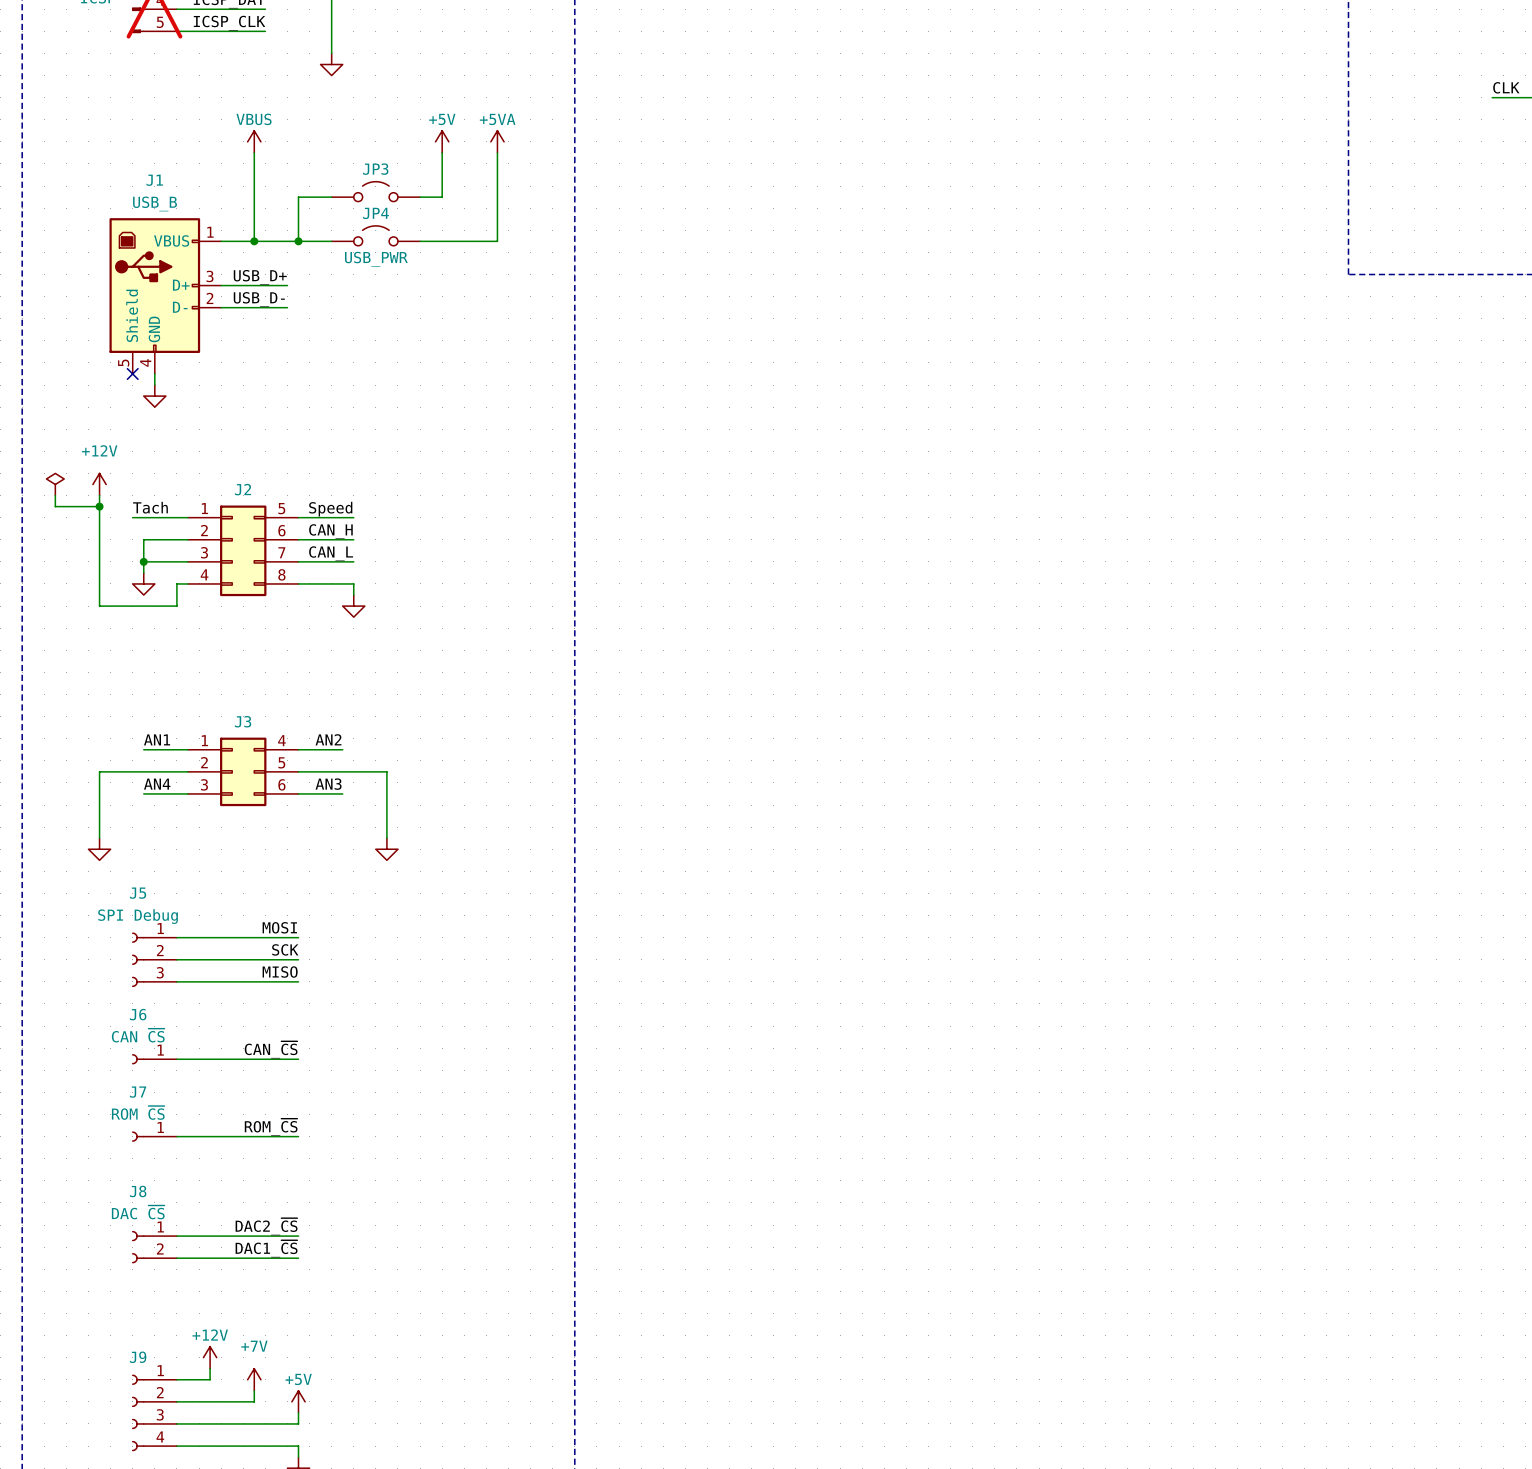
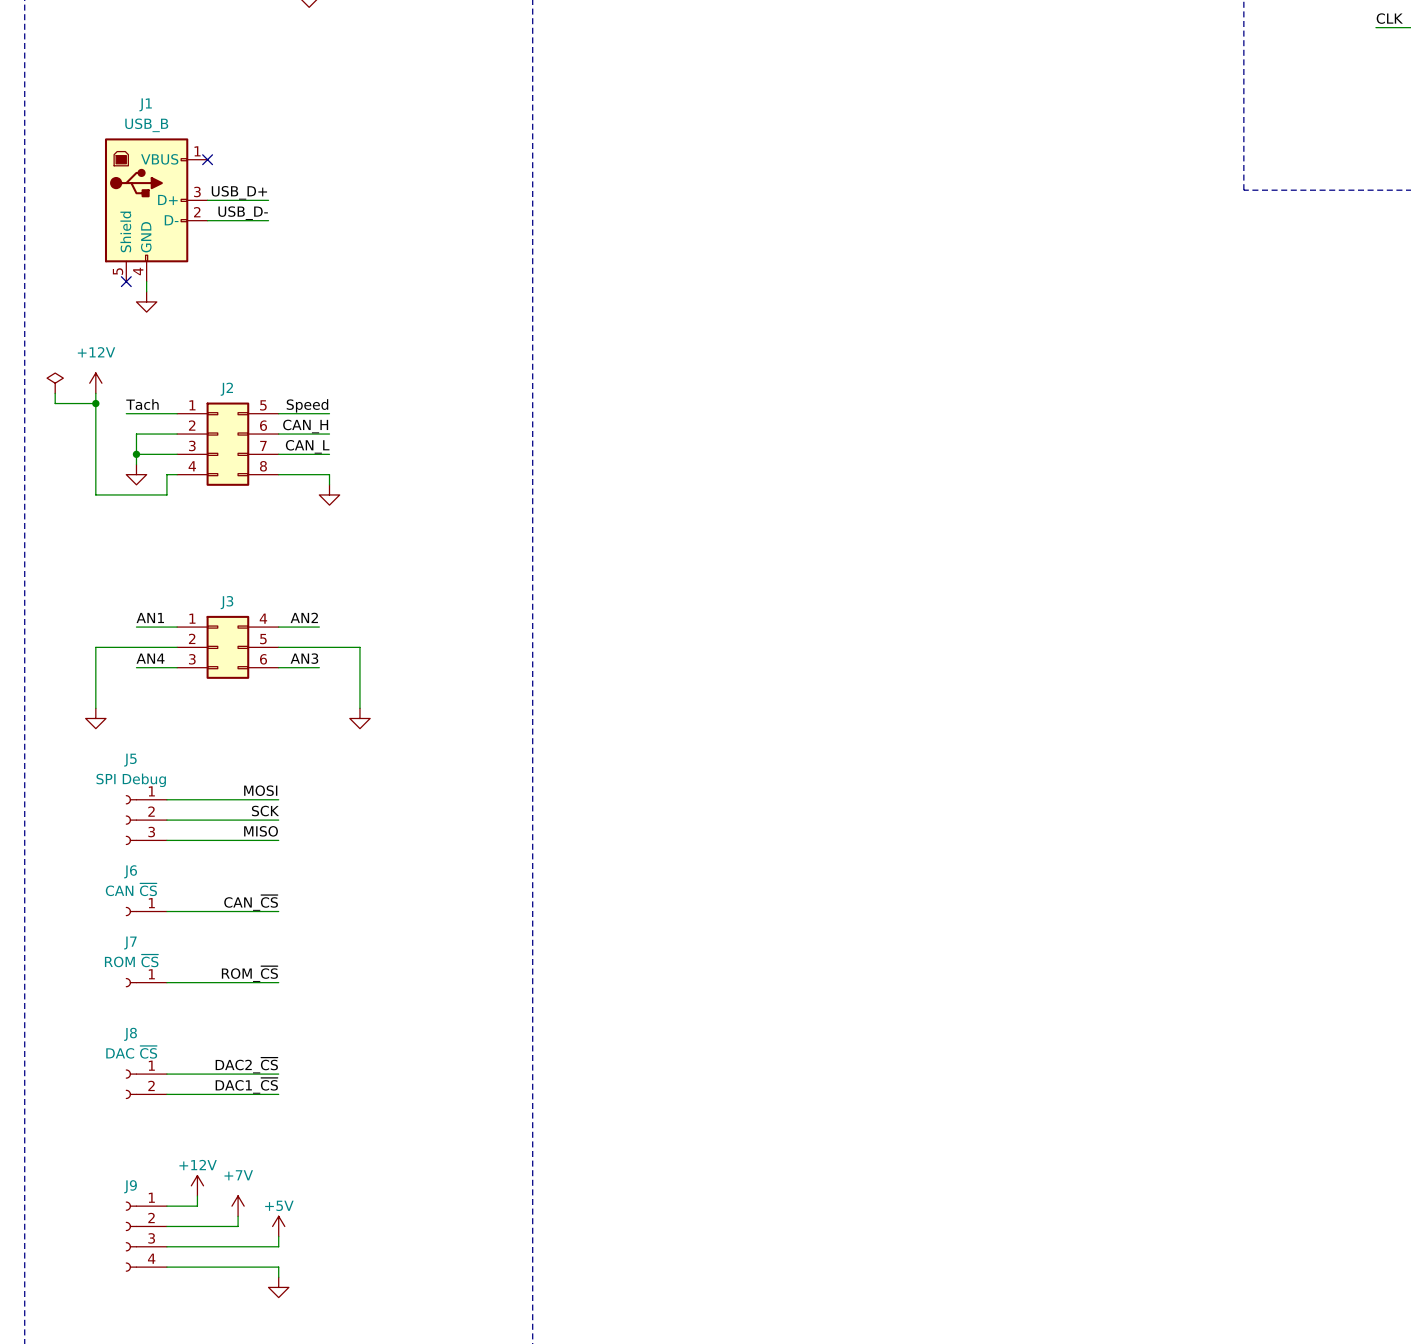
power symbol: VBUS (254, 141) -> none
power symbol: +5V (442, 141) -> none
power symbol: +5VA (497, 141) -> none
wire: (254, 152) (254, 241) -> none
wire: (442, 152) (442, 197) (420, 197) -> none
wire: (497, 152) (497, 241) (420, 241) -> none
JP3: (375, 191) -> none
wire: (331, 197) (298, 197) (298, 241) -> none
JP4: USB_PWR (375, 235) -> none
wire: (221, 241) (331, 241) -> none
no-connect mark: none -> (207, 159)
junction: (254, 241) -> none
junction: (298, 241) -> none

